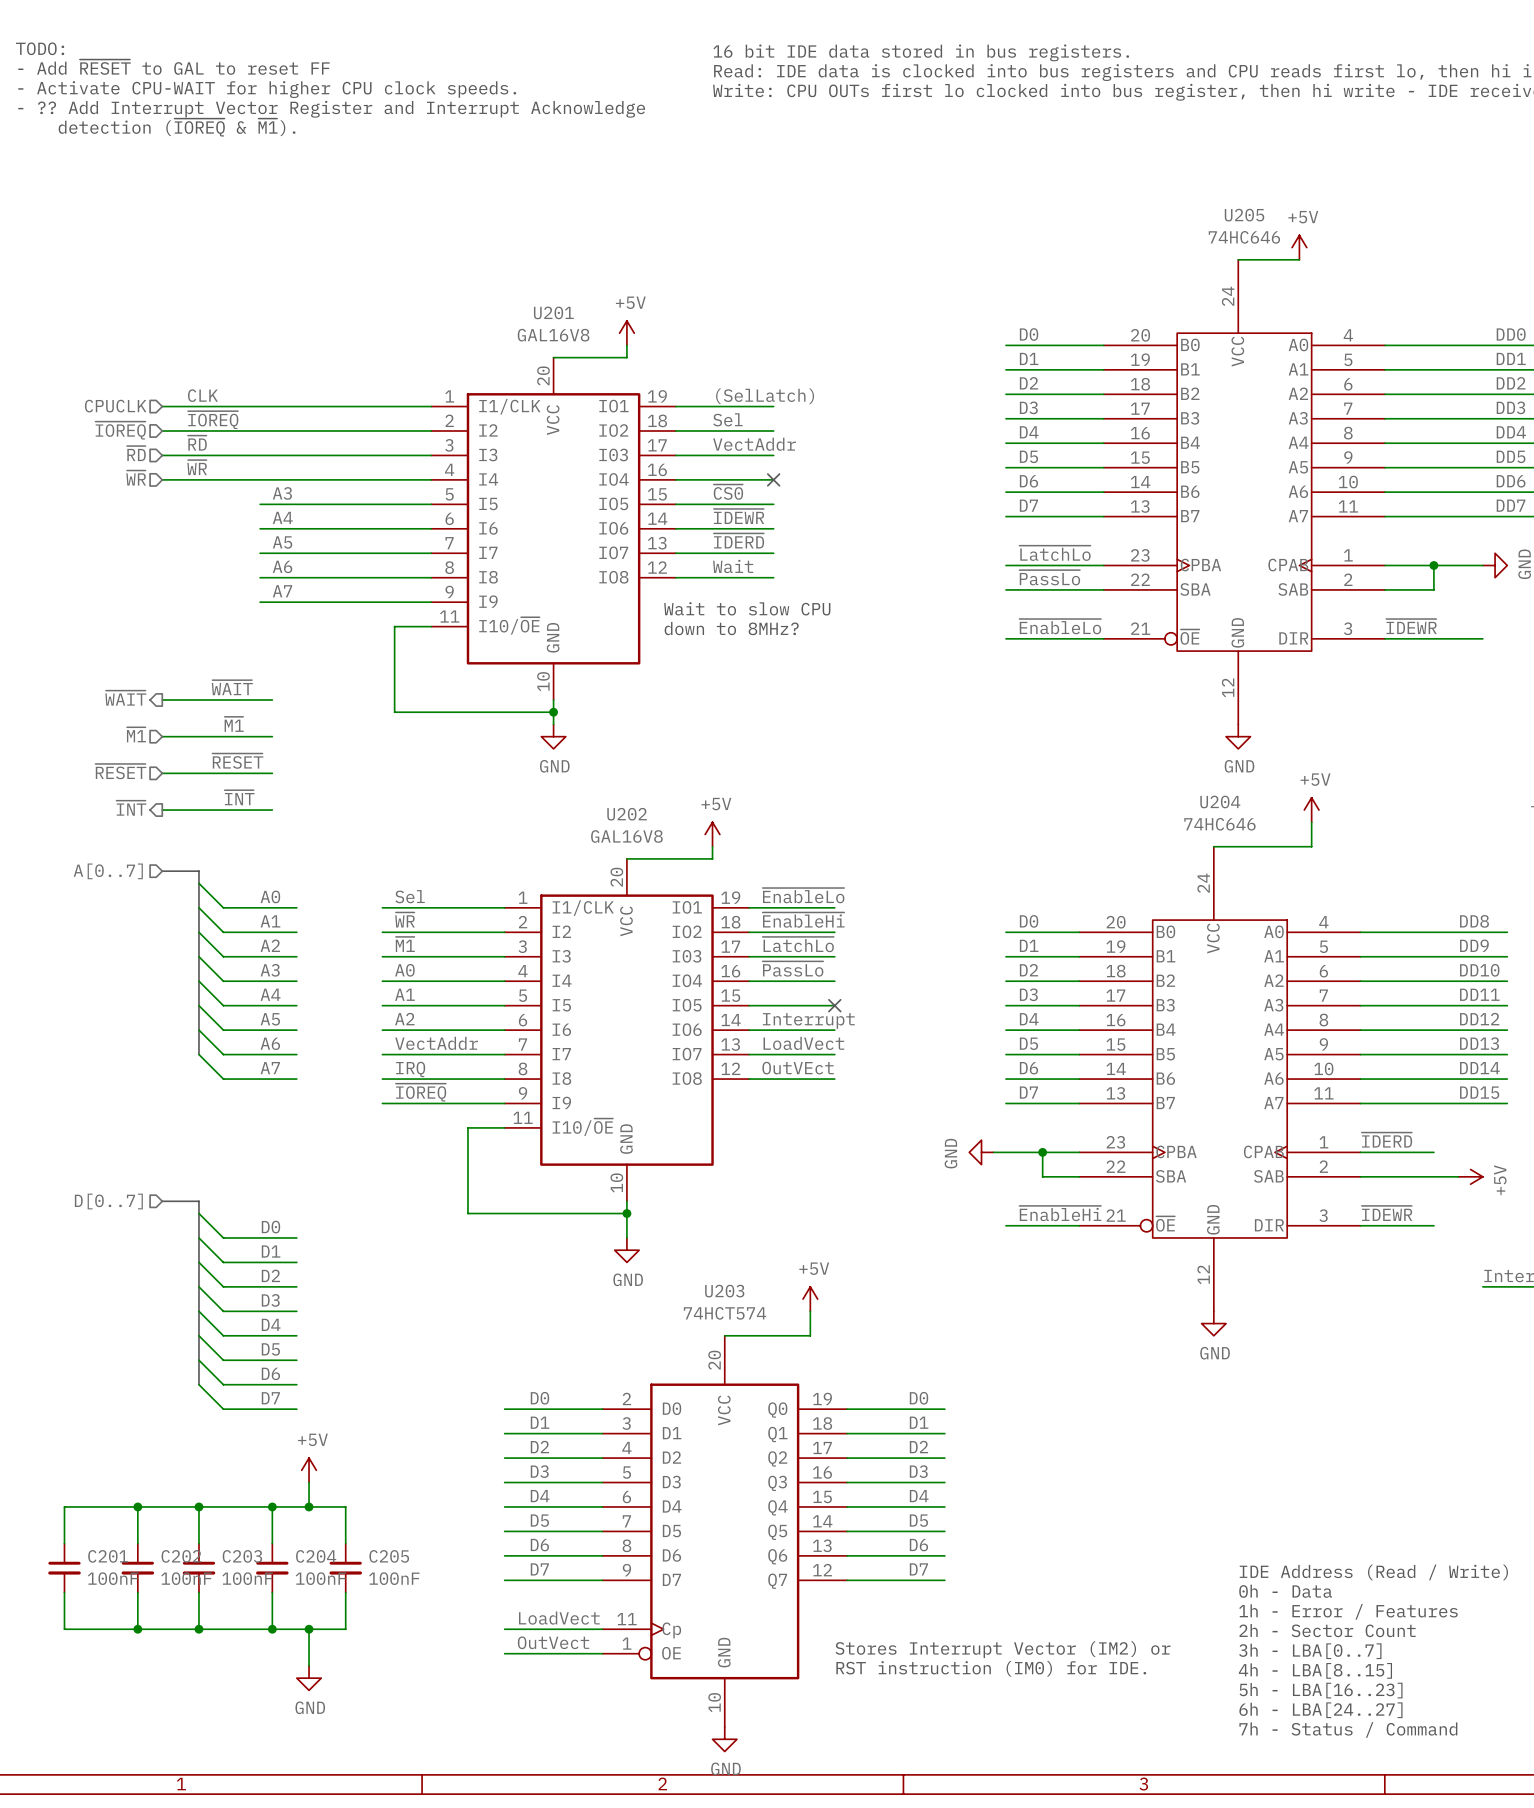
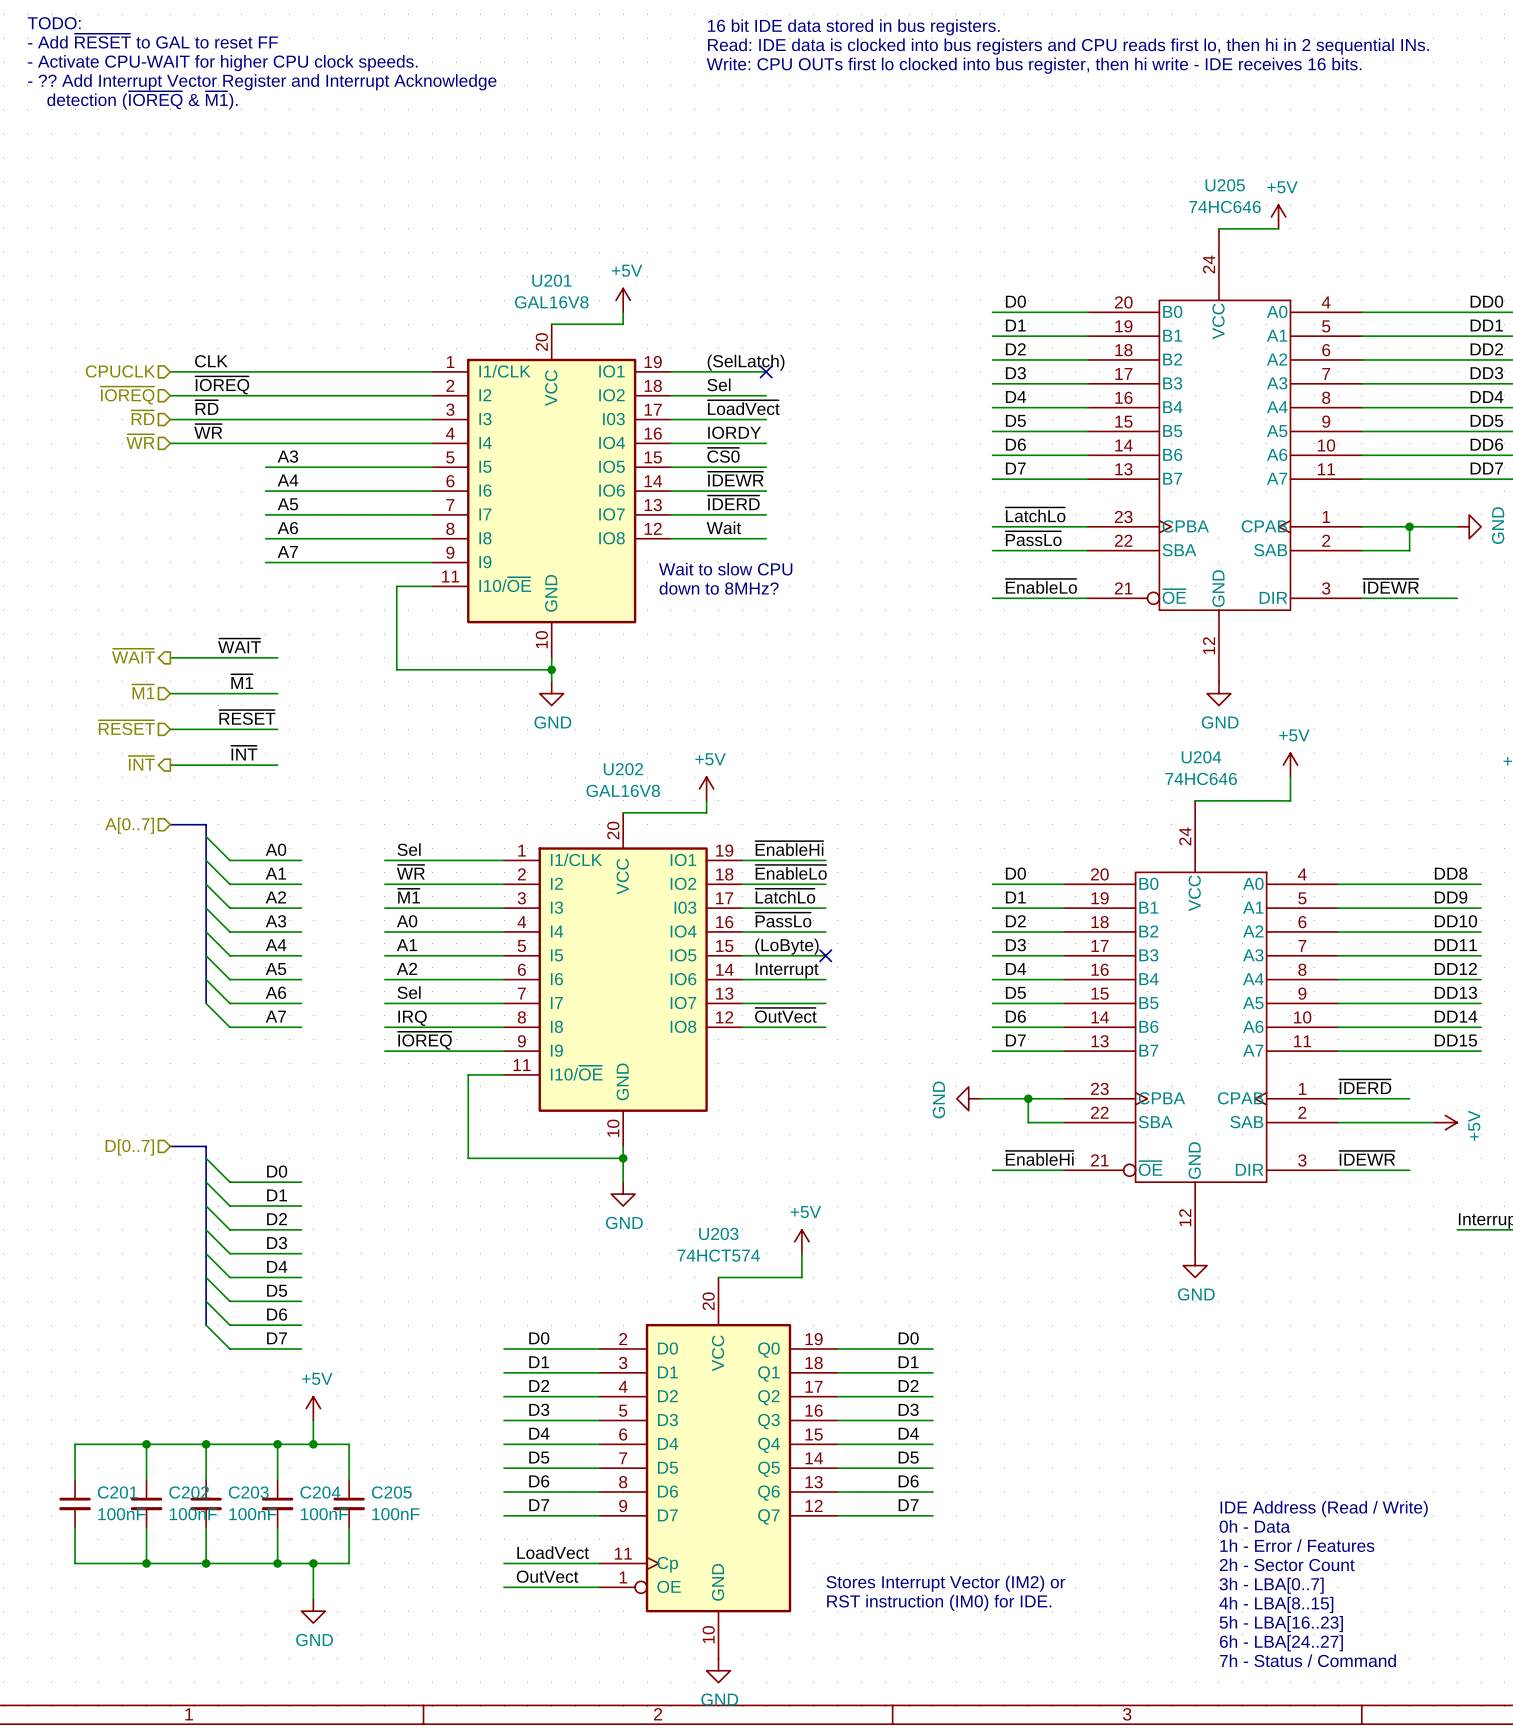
no-connect mark: none -> (766, 371)
label: VectAddr (754, 444) -> ~{LoadVect} (743, 407)
label: none -> IORDY (734, 432)
no-connect mark: (773, 479) -> none
label: ~{EnableLo} (803, 895) -> ~{EnableHi} (789, 848)
label: ~{EnableHi} (803, 920) -> ~{EnableLo} (791, 872)
label: none -> (LoByte) (786, 946)
label: VectAddr (436, 1043) -> Sel (409, 992)
label: LoadVect (803, 1043) -> none
label: OutVEct (798, 1068) -> ~{OutVect} (785, 1015)

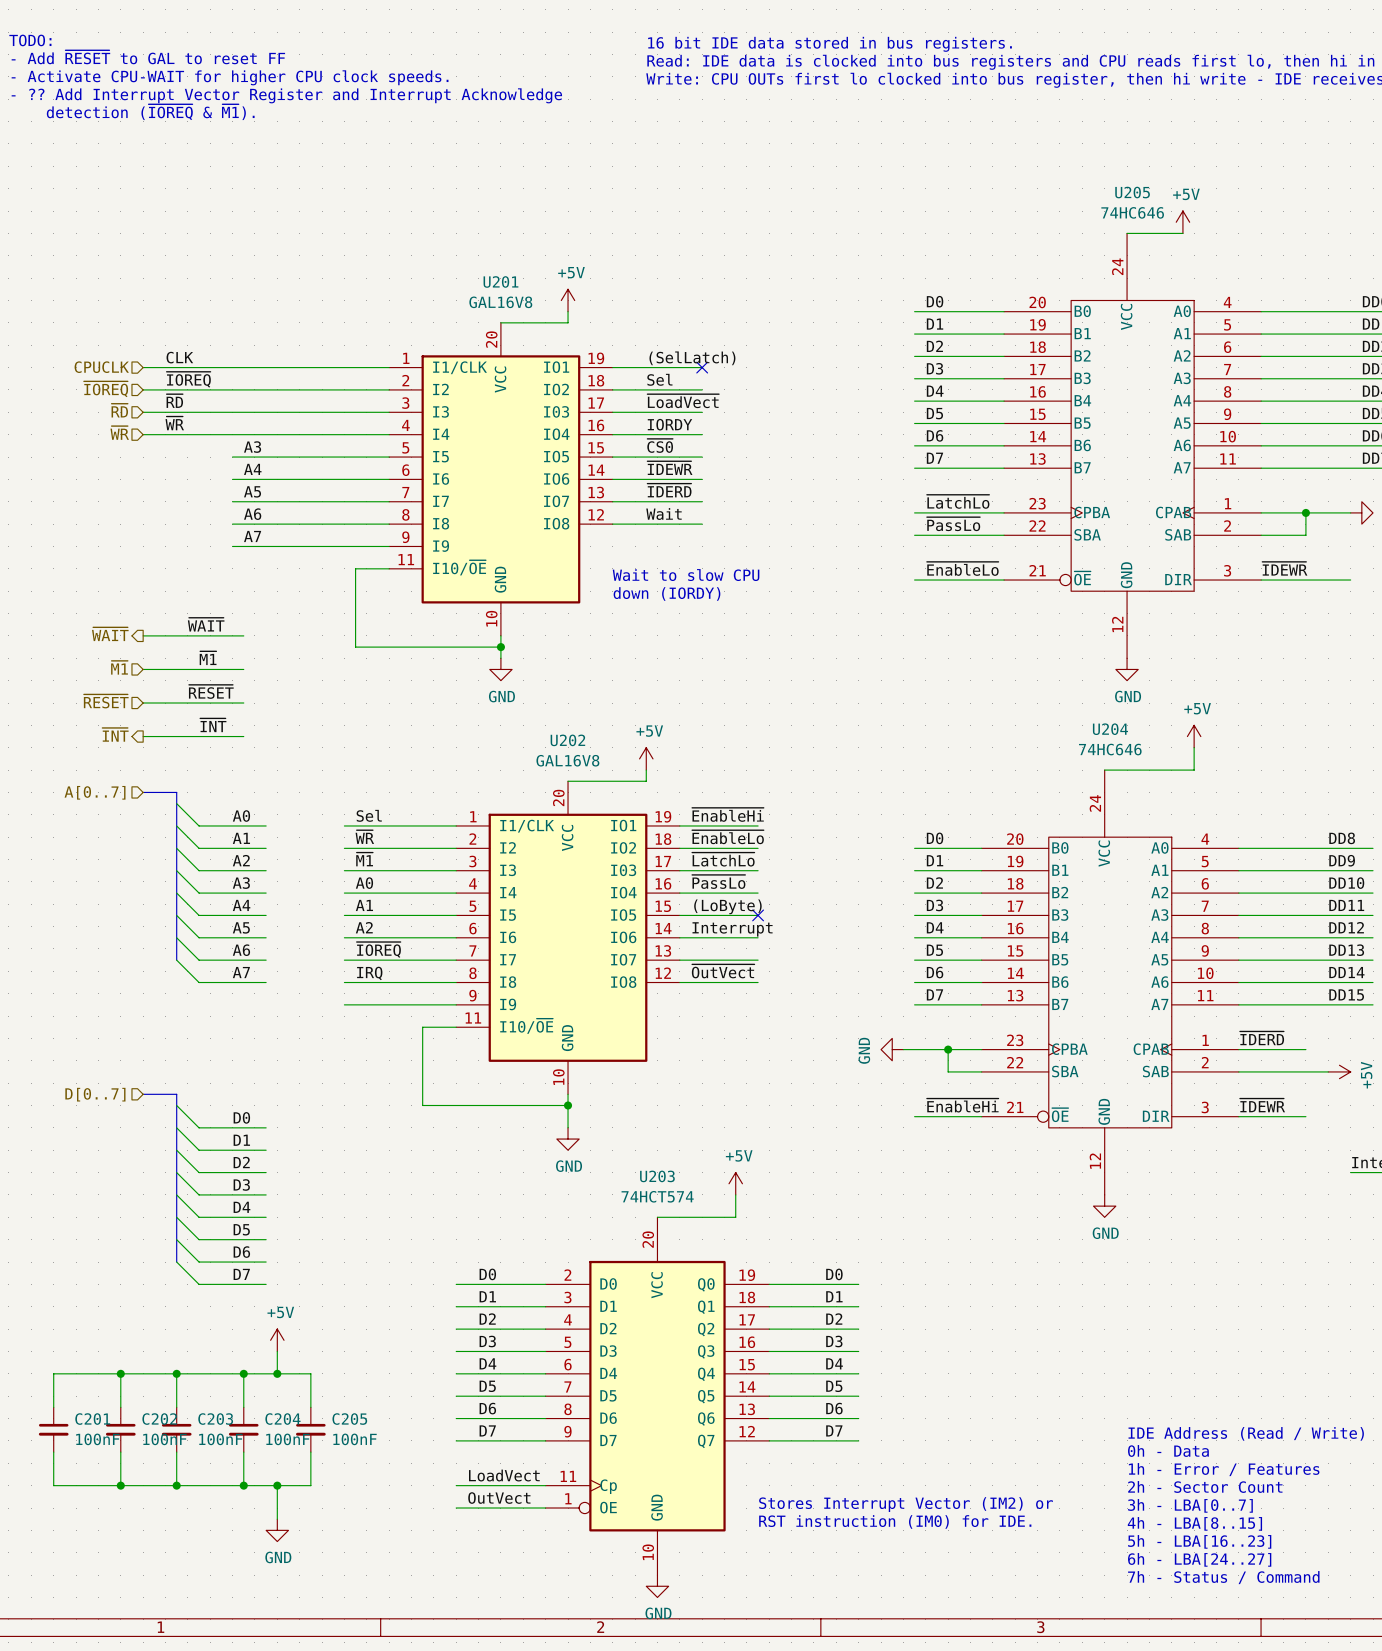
text position: Wait to slow CPU (725, 569) -> Wait to slow CPU (686, 575)
text: down to 8MHz? (719, 588) -> none
text: none -> down (IORDY) (667, 593)
label: Sel (409, 992) -> ~{IOREQ} (378, 949)
label: ~{IOREQ} (424, 1040) -> none

